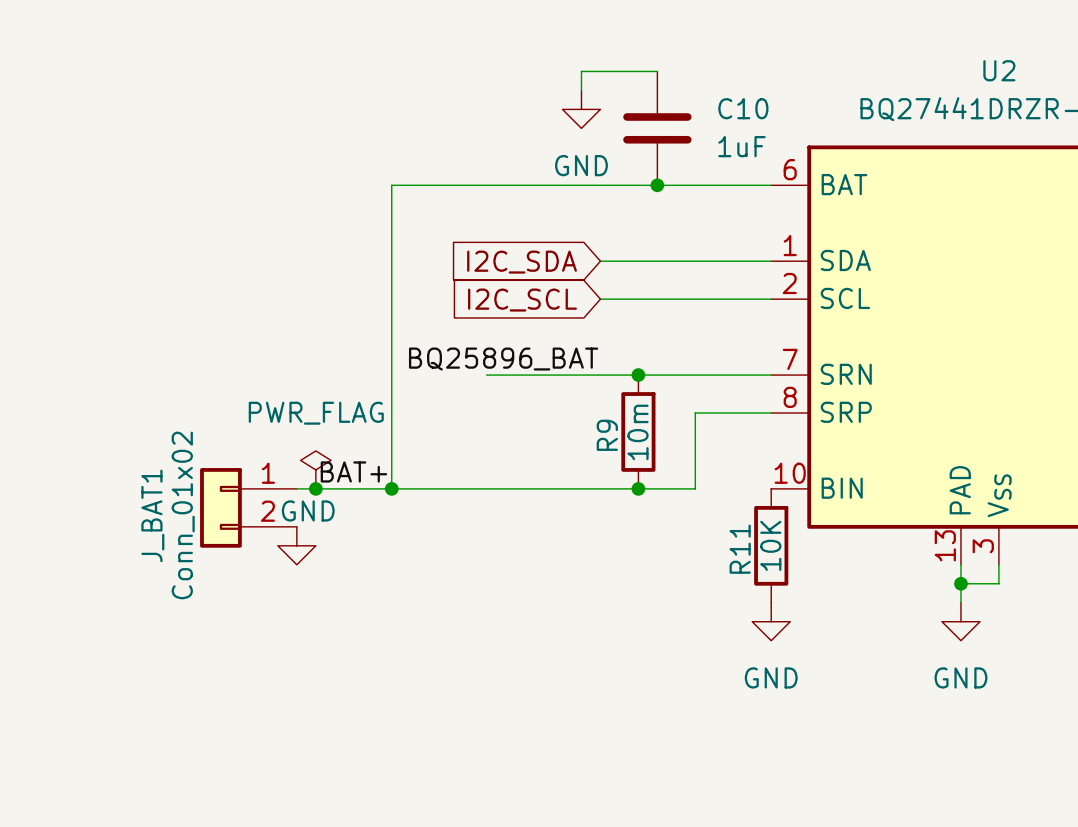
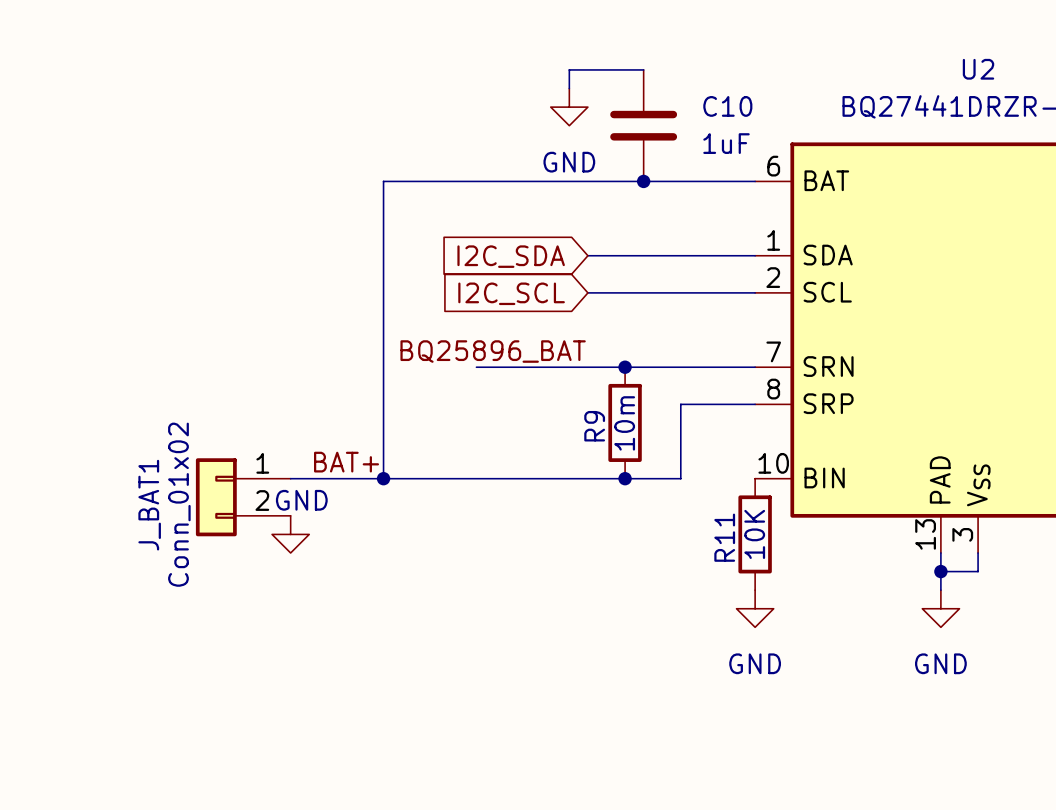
power symbol: PWR_FLAG (315, 469) -> none
junction: (315, 488) -> none

